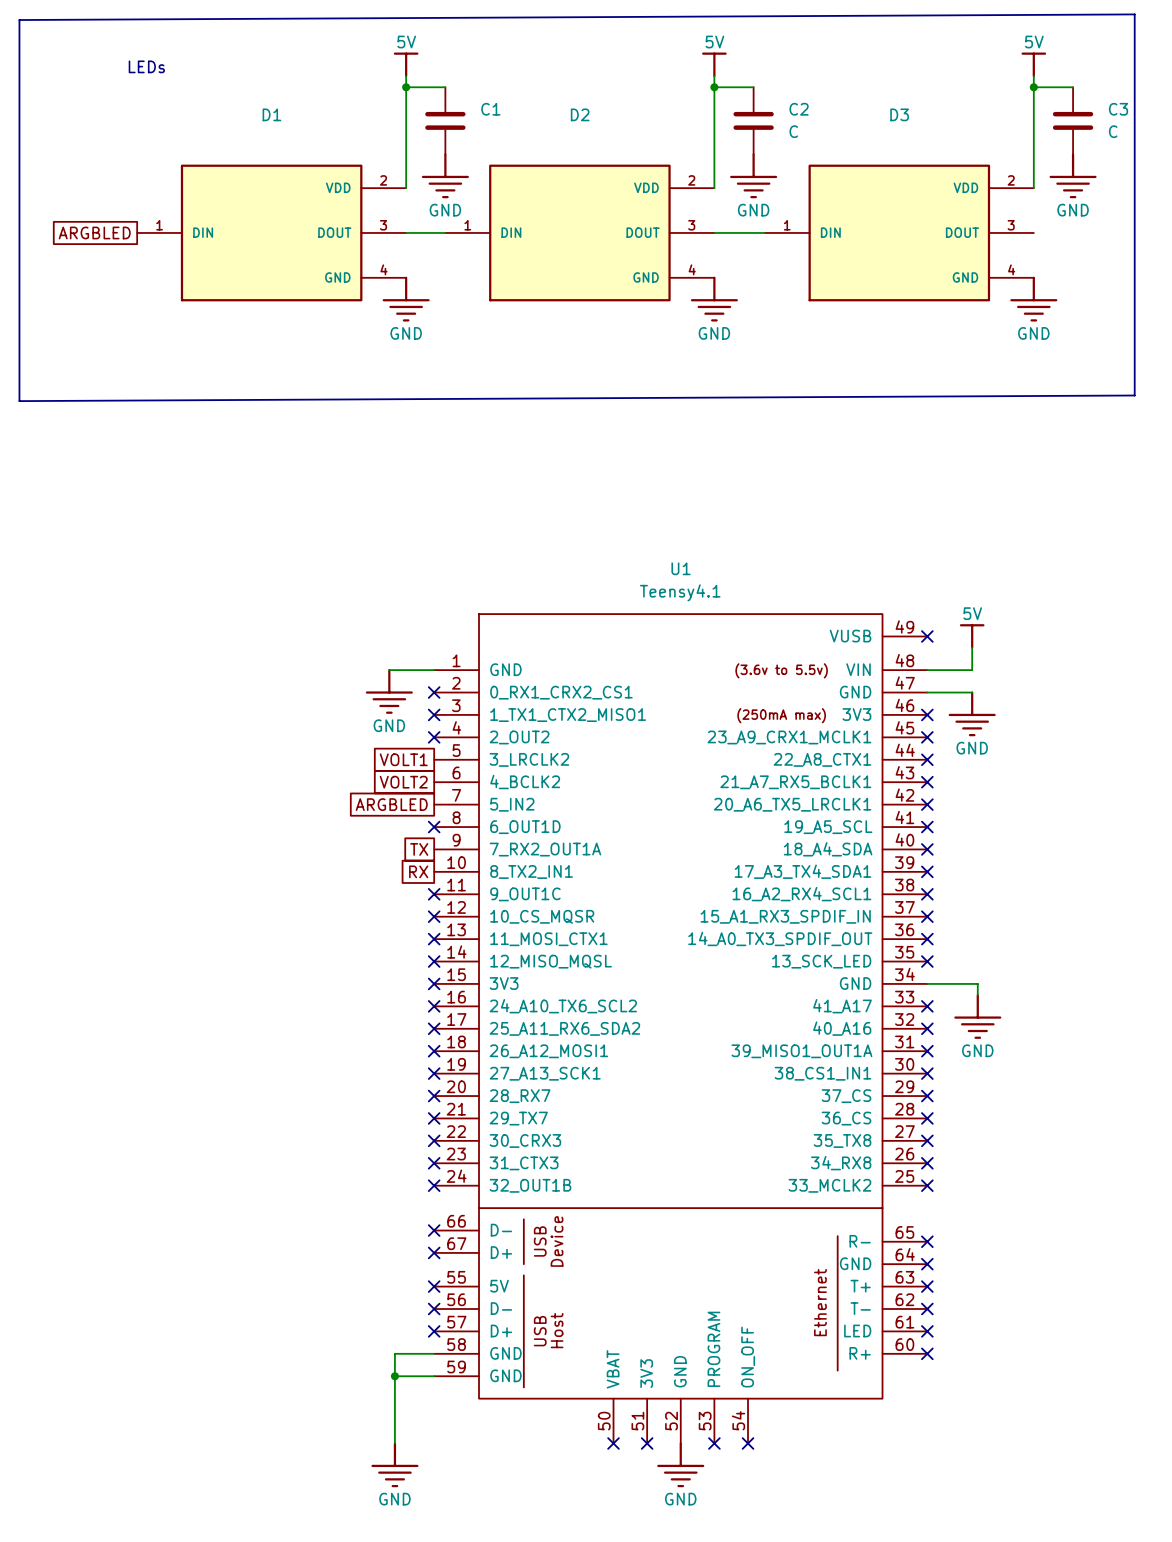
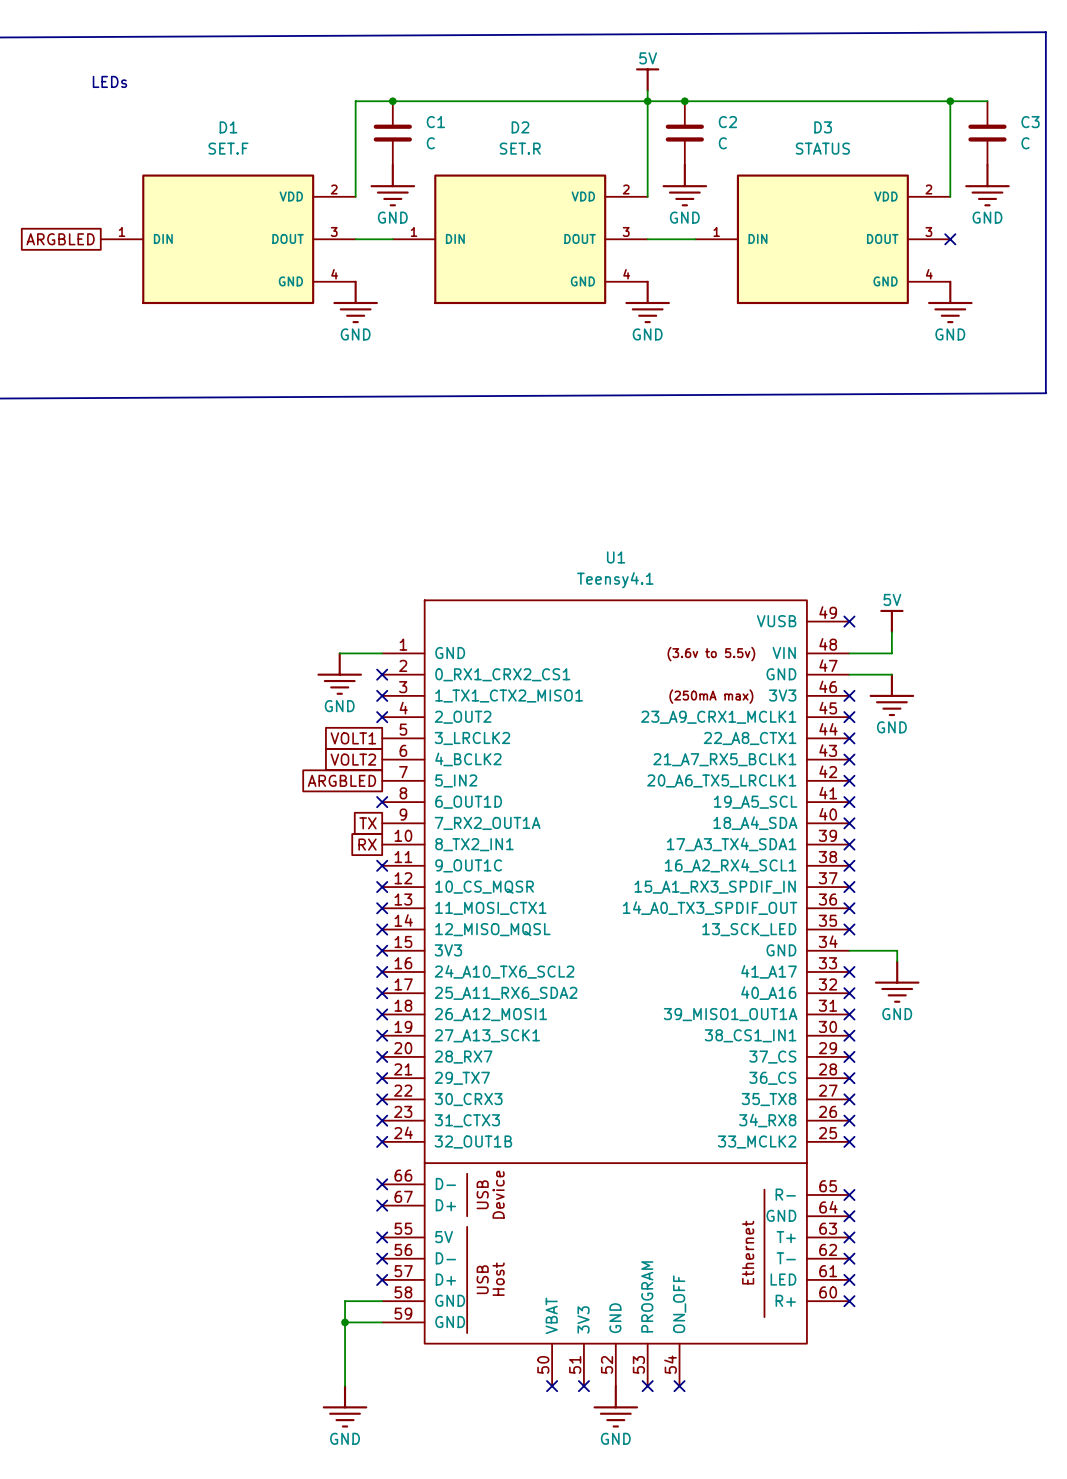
power symbol: 5V (406, 64) -> none
power symbol: 5V (1033, 64) -> none
wire: (406, 76) (406, 87) -> none
wire: (1033, 76) (1033, 87) -> (684, 101) (950, 101)
junction position: (406, 87) -> (392, 101)
wire: none -> (392, 101) (647, 101)
junction: none -> (684, 101)
C1 value: none -> C (430, 143)
D1 value: none -> SET.F (228, 148)
D2 value: none -> SET.R (520, 148)
D3 value: none -> STATUS (822, 148)
no-connect mark: none -> (950, 239)

